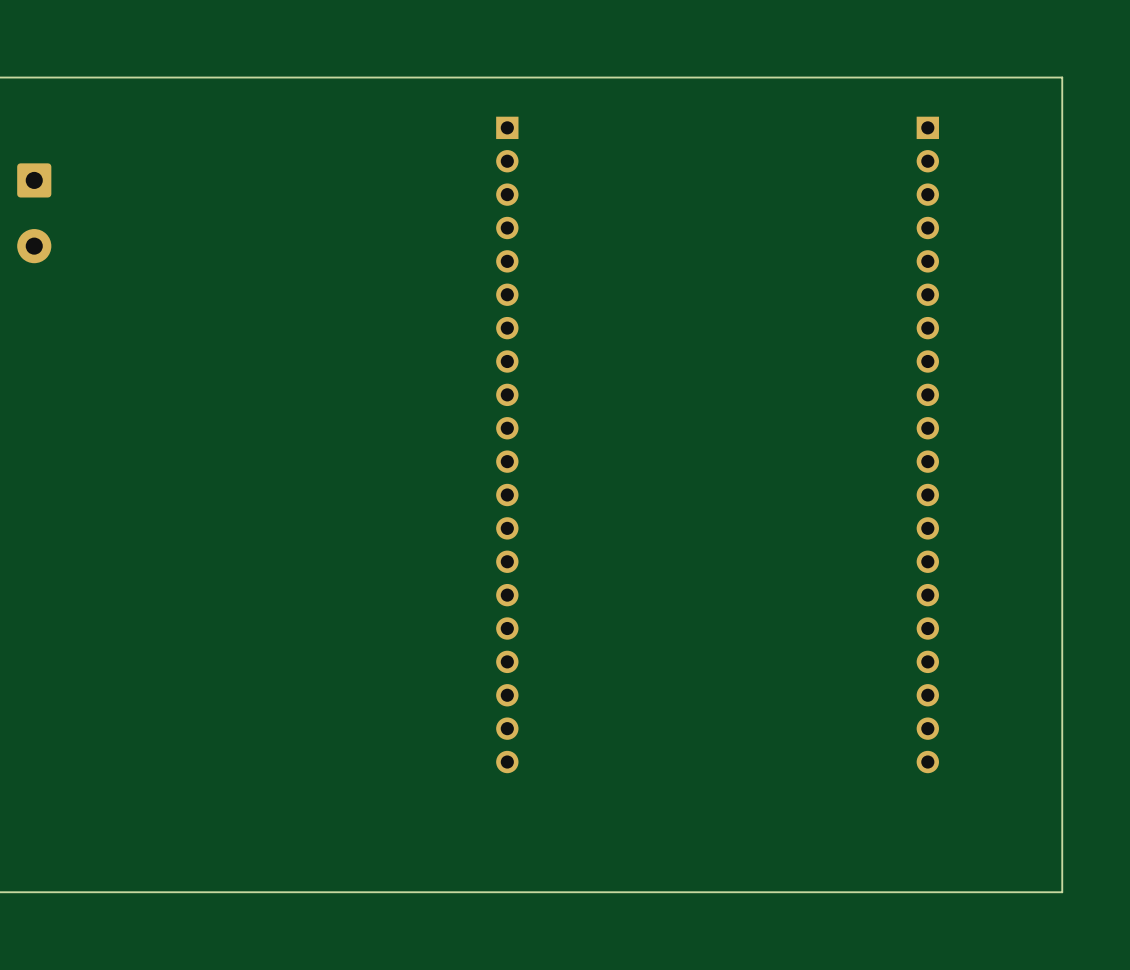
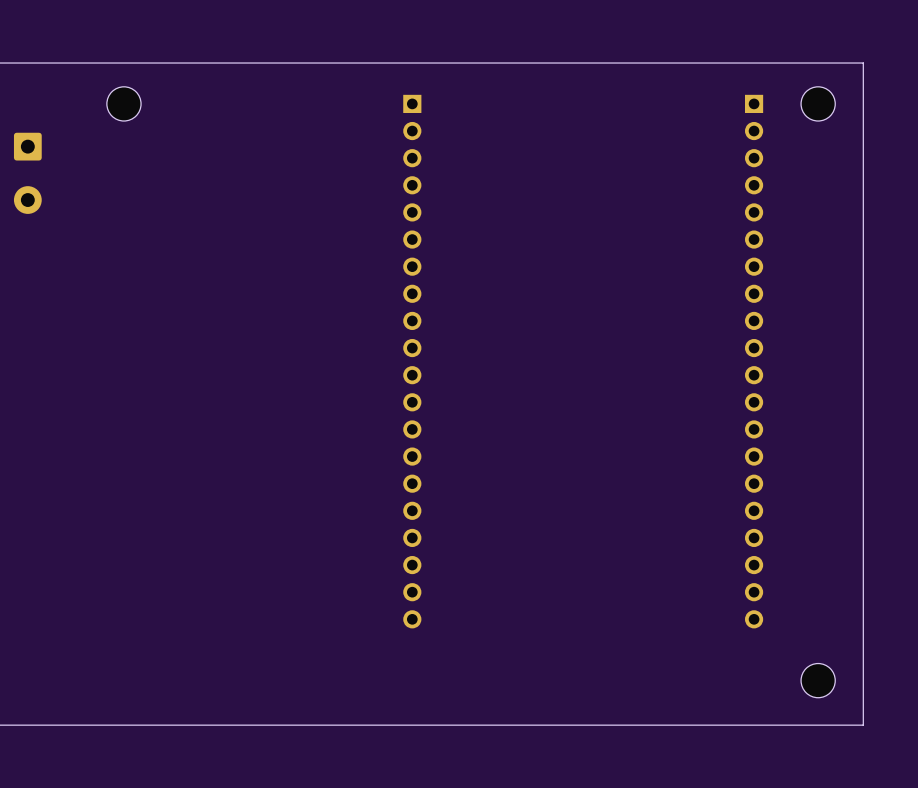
part: none -> (123, 103)
part: none -> (818, 103)
part: none -> (818, 680)

